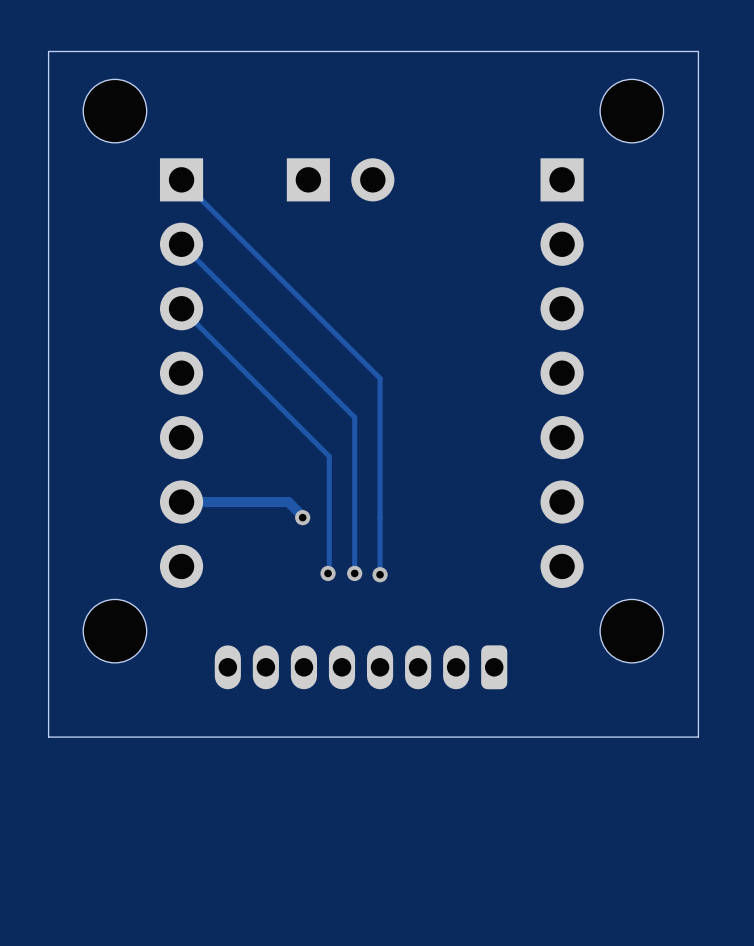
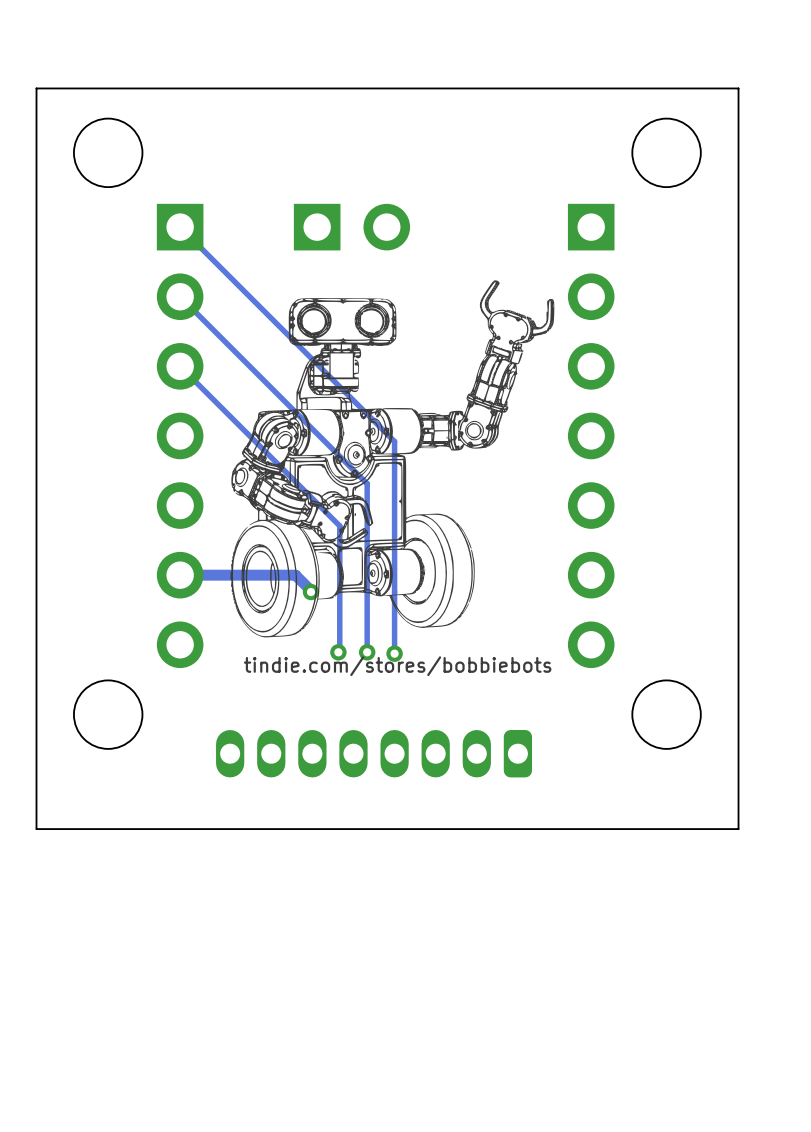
drawing: none -> [230, 280, 555, 638]
text: none -> tindie.com/stores/bobbiebots (397, 666)

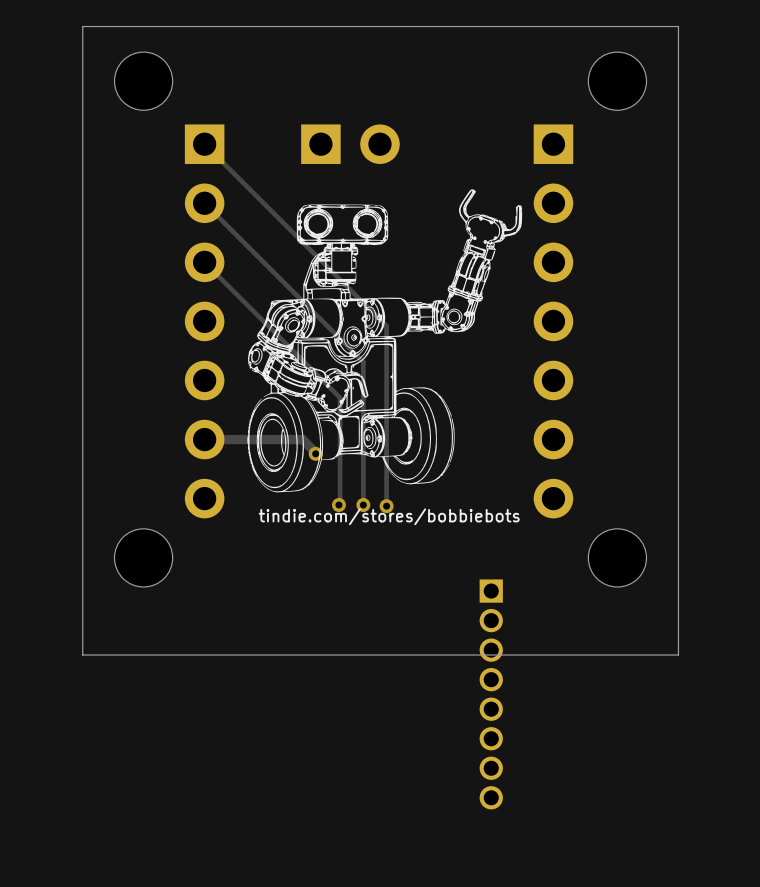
part: (374, 753) -> none
part: none -> (491, 694)

